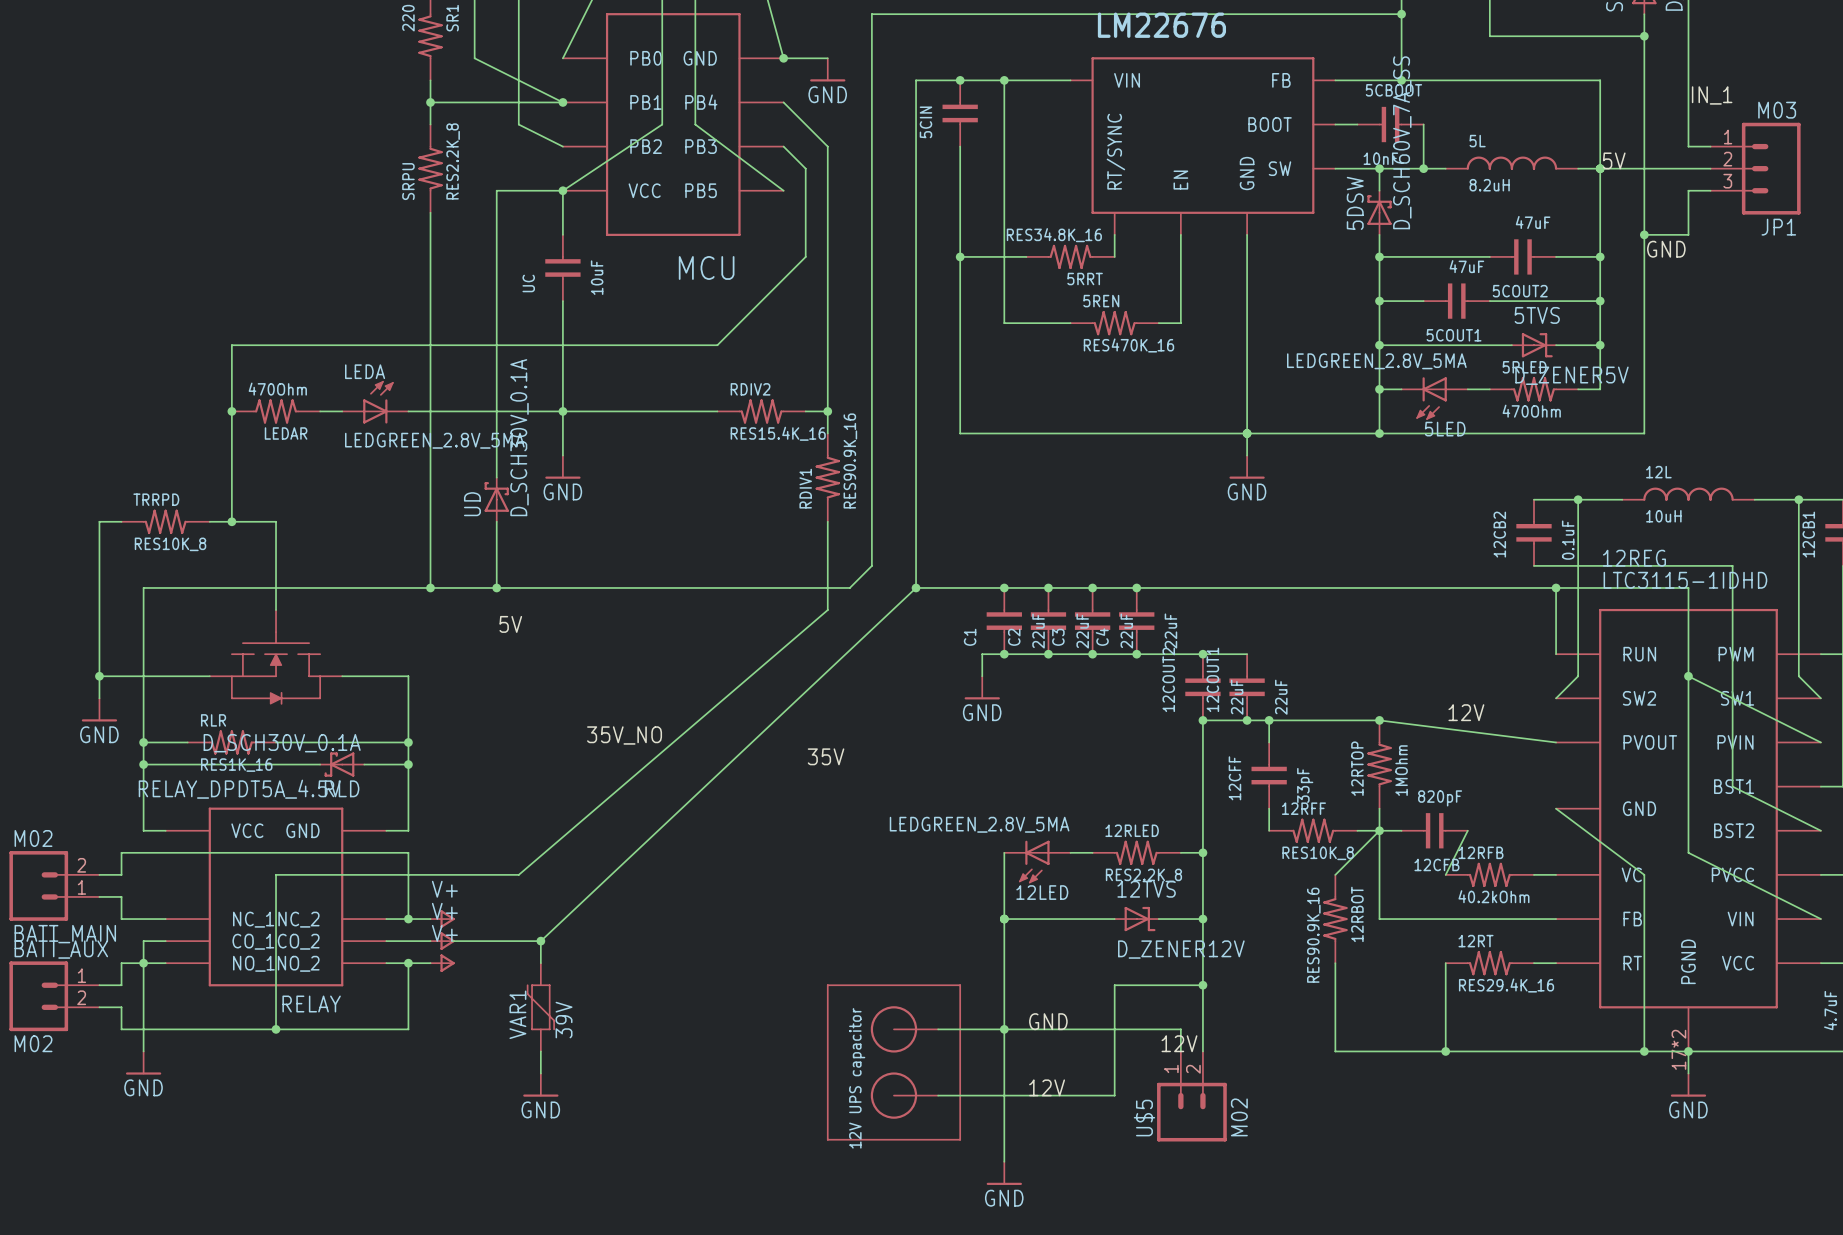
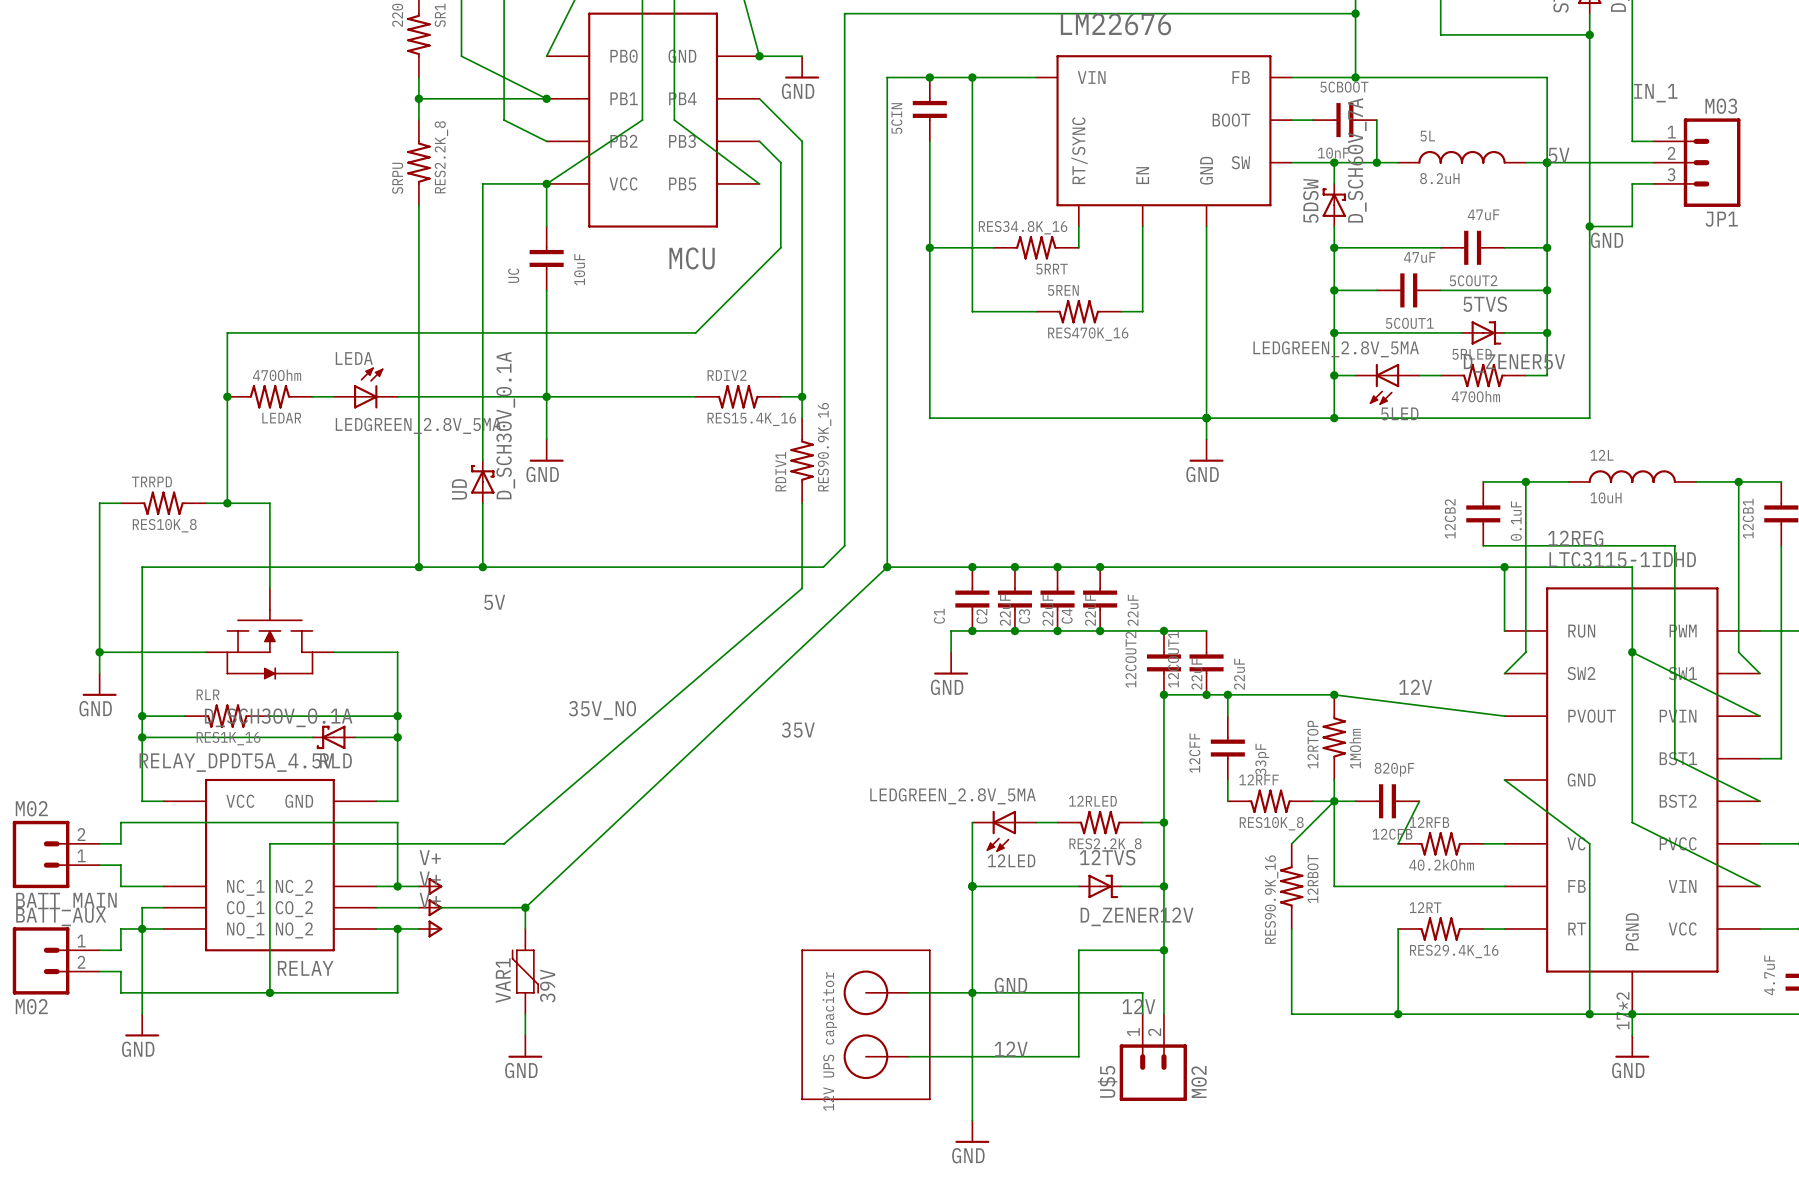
5DSW value: D_SCH60V_7A_SS (1402, 142) -> D_SCH60V_7A (1357, 160)

